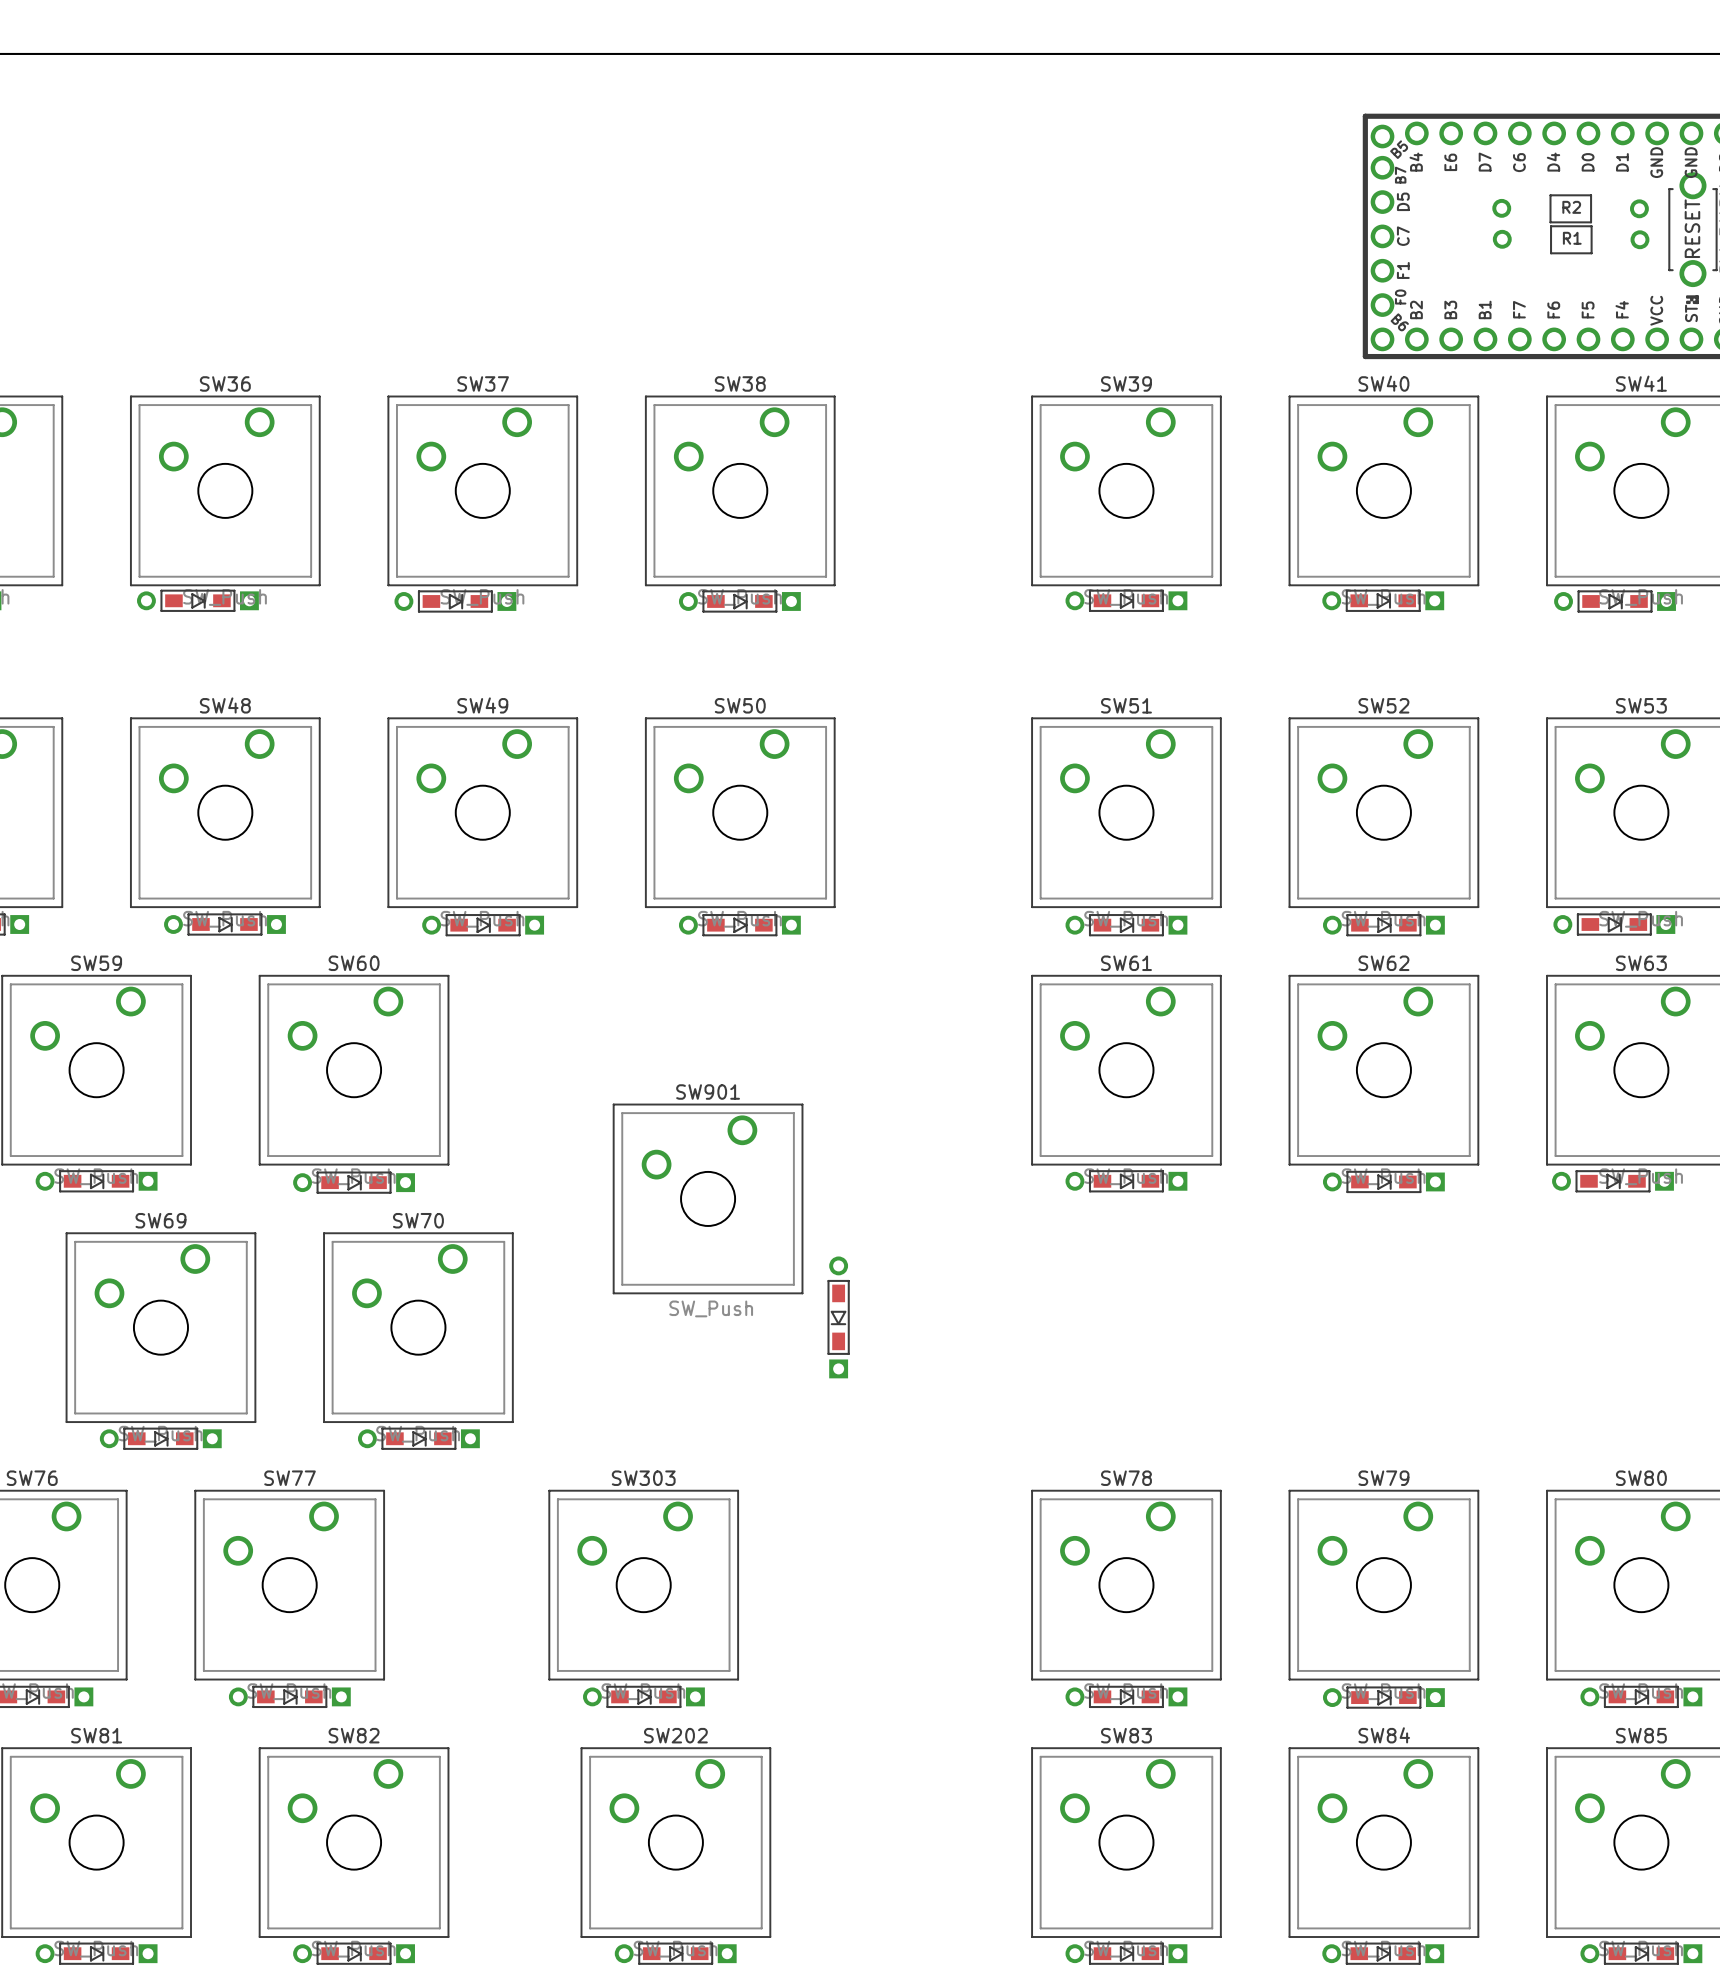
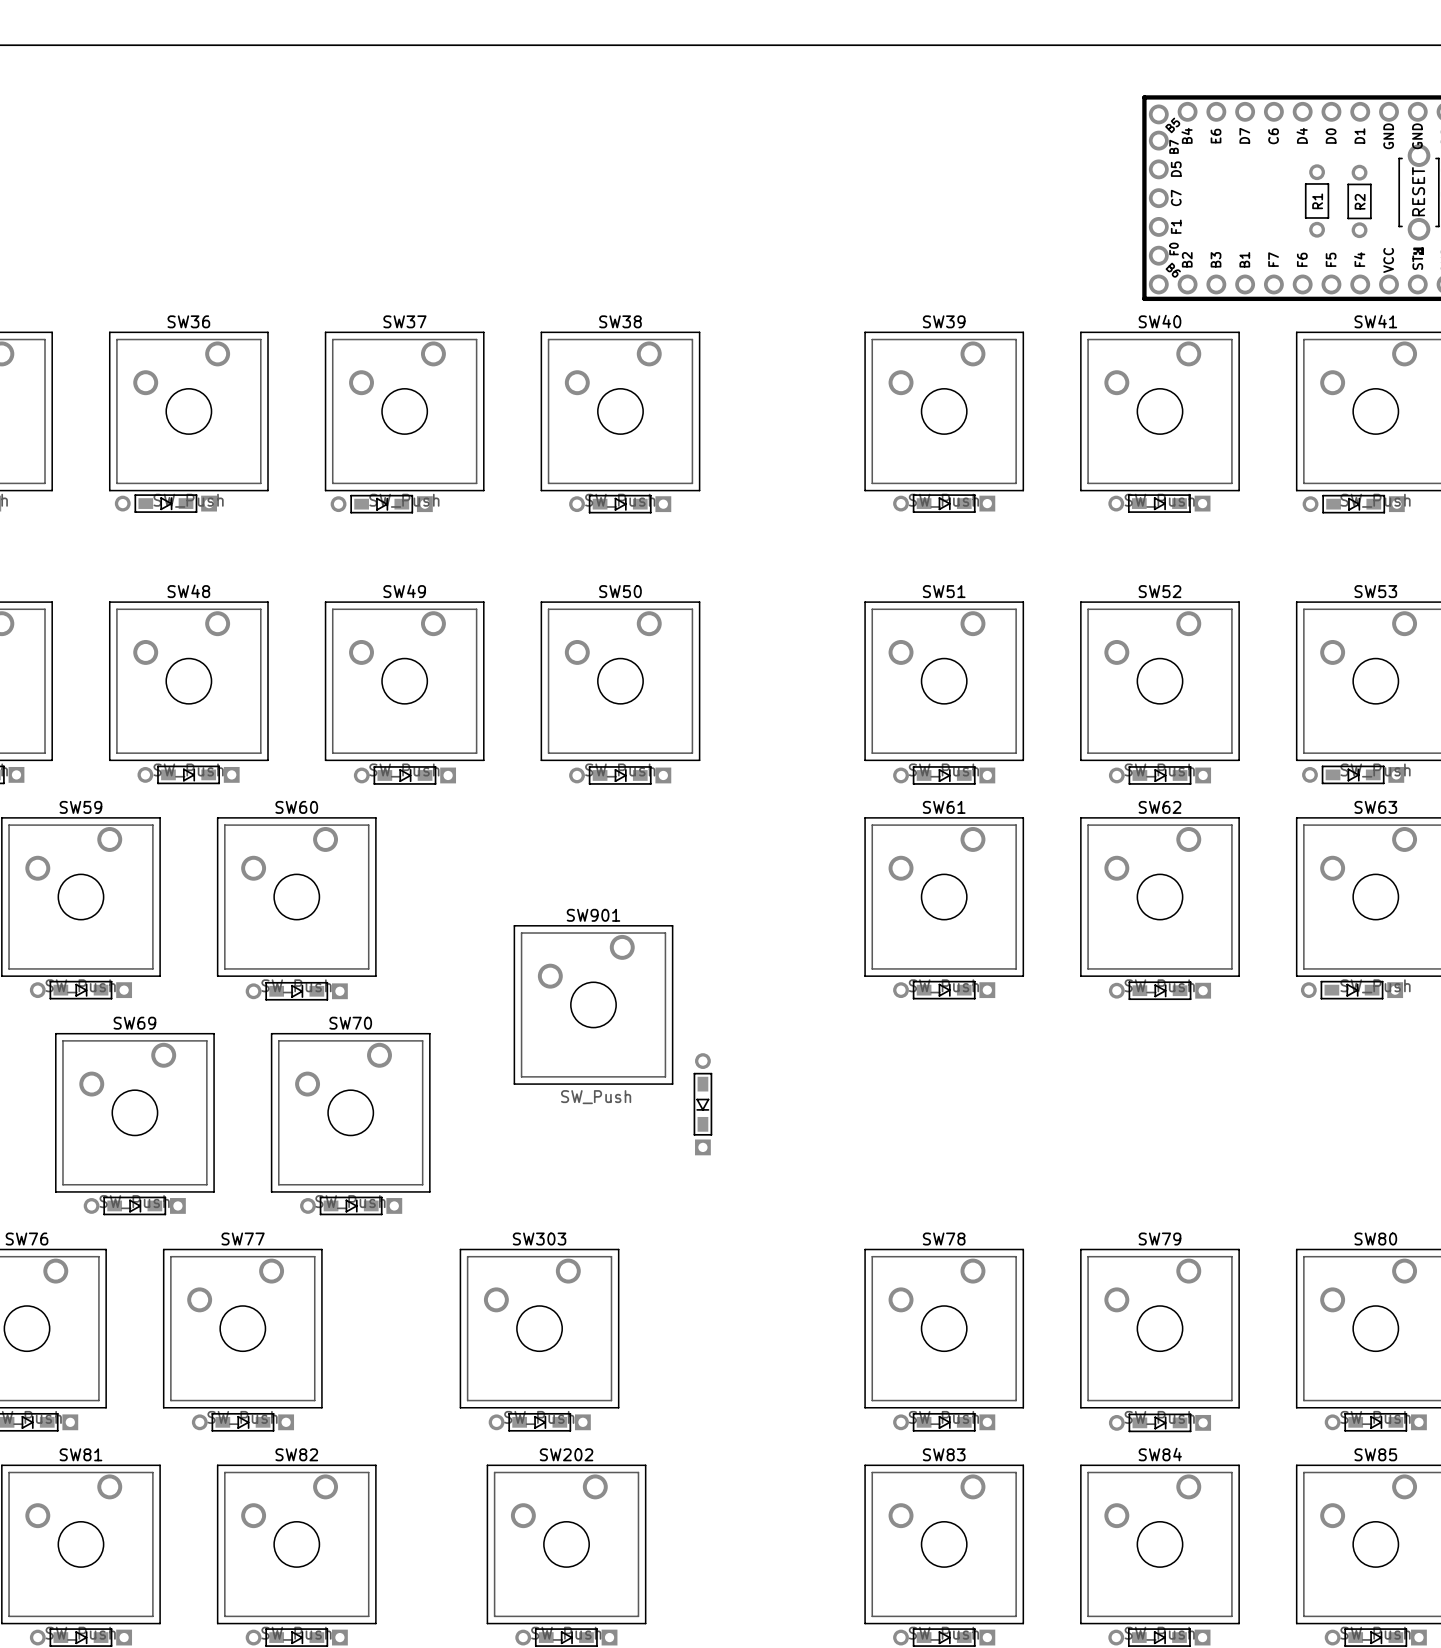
R2 footprint: [1492, 194, 1649, 224] -> [1347, 164, 1372, 239]
R1 footprint: [1492, 225, 1650, 255] -> [1304, 164, 1330, 238]

